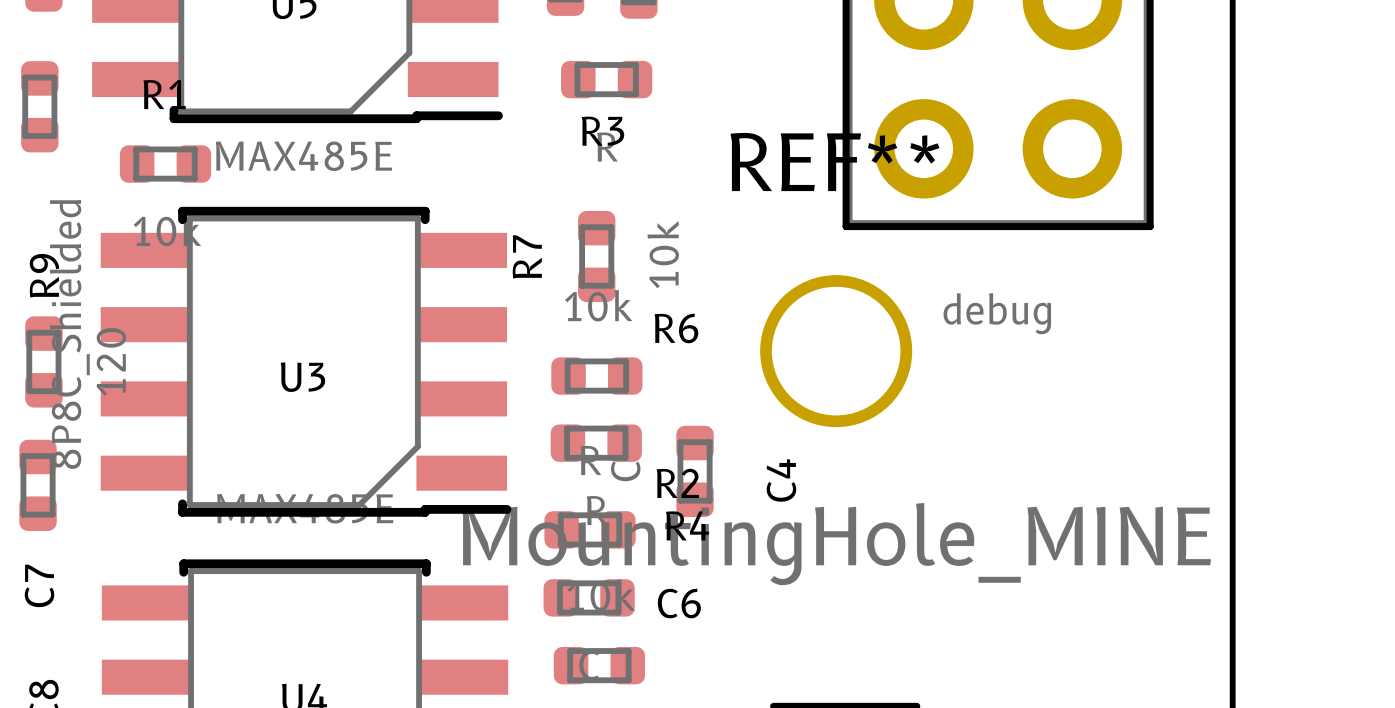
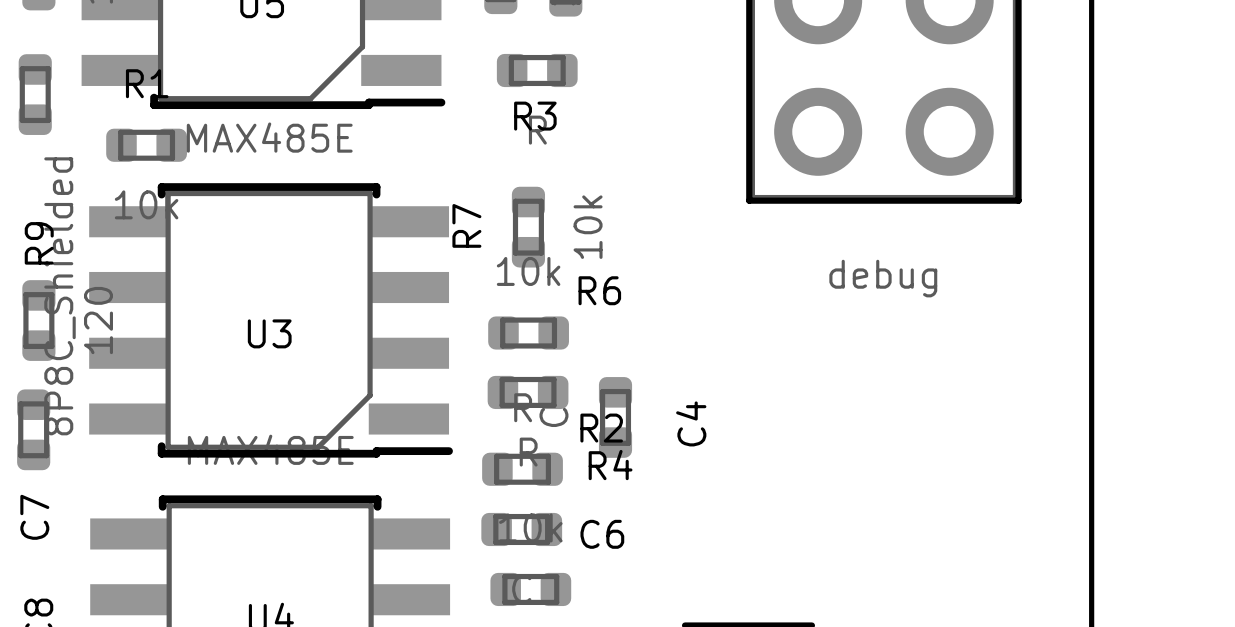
REF**: MountingHole_MINE (836, 351) -> none

